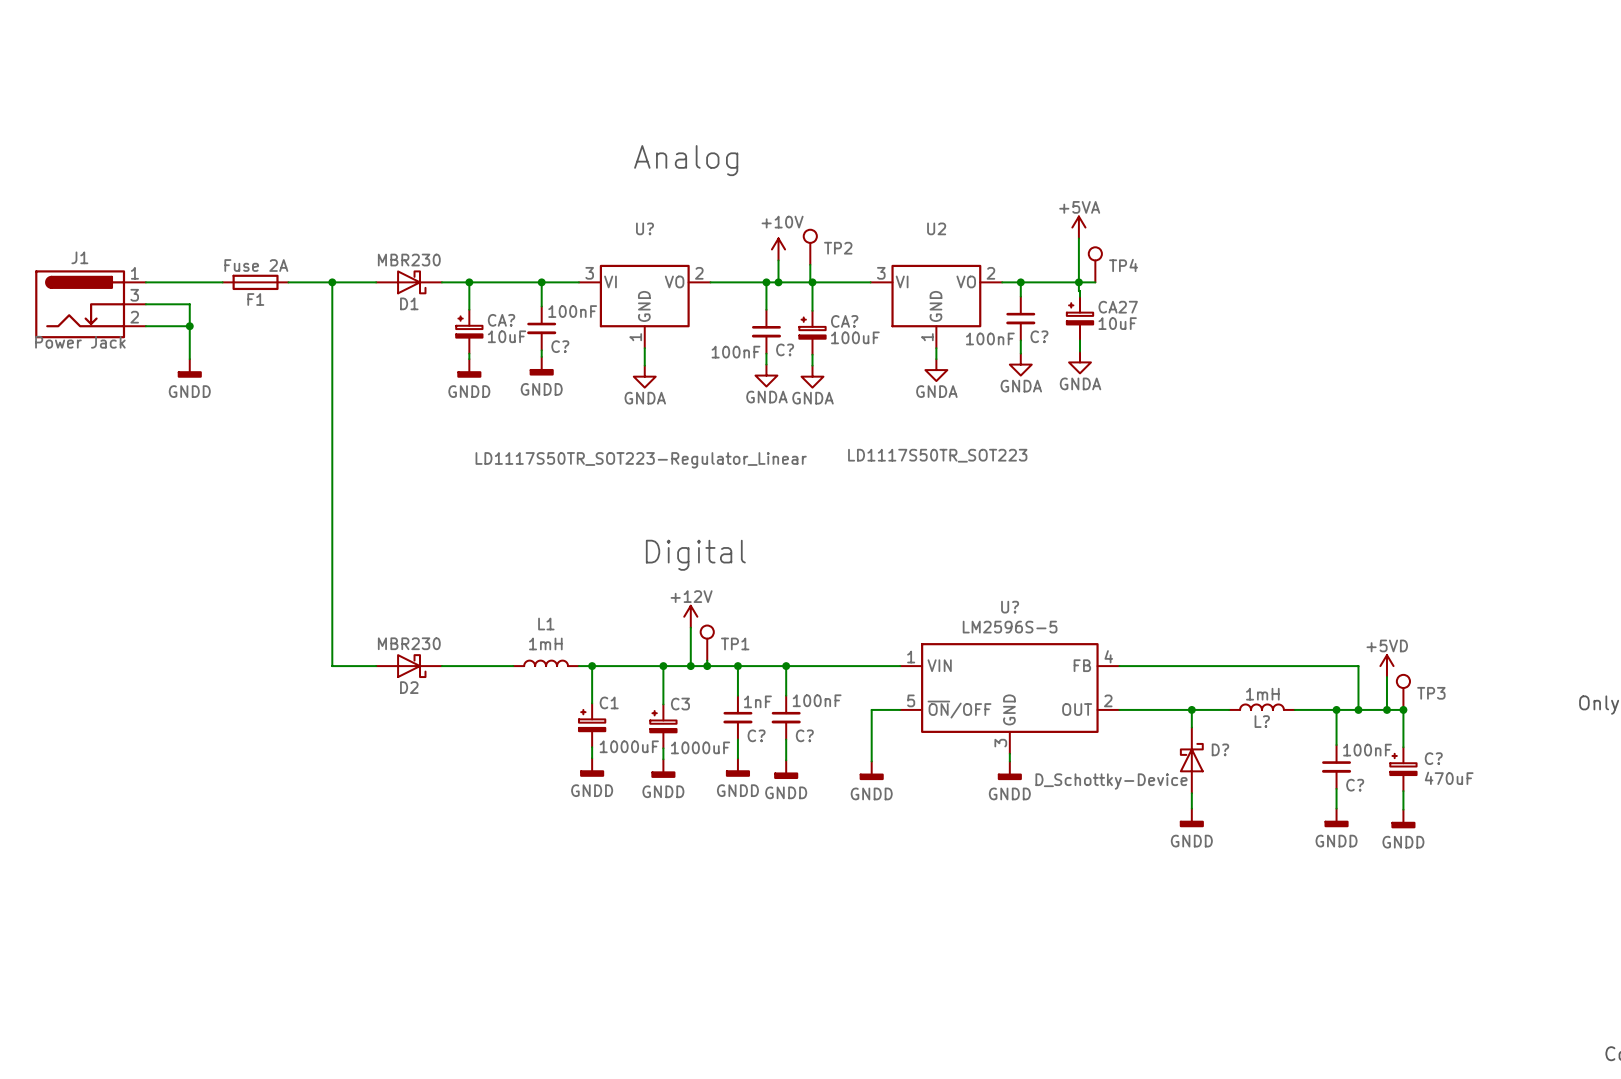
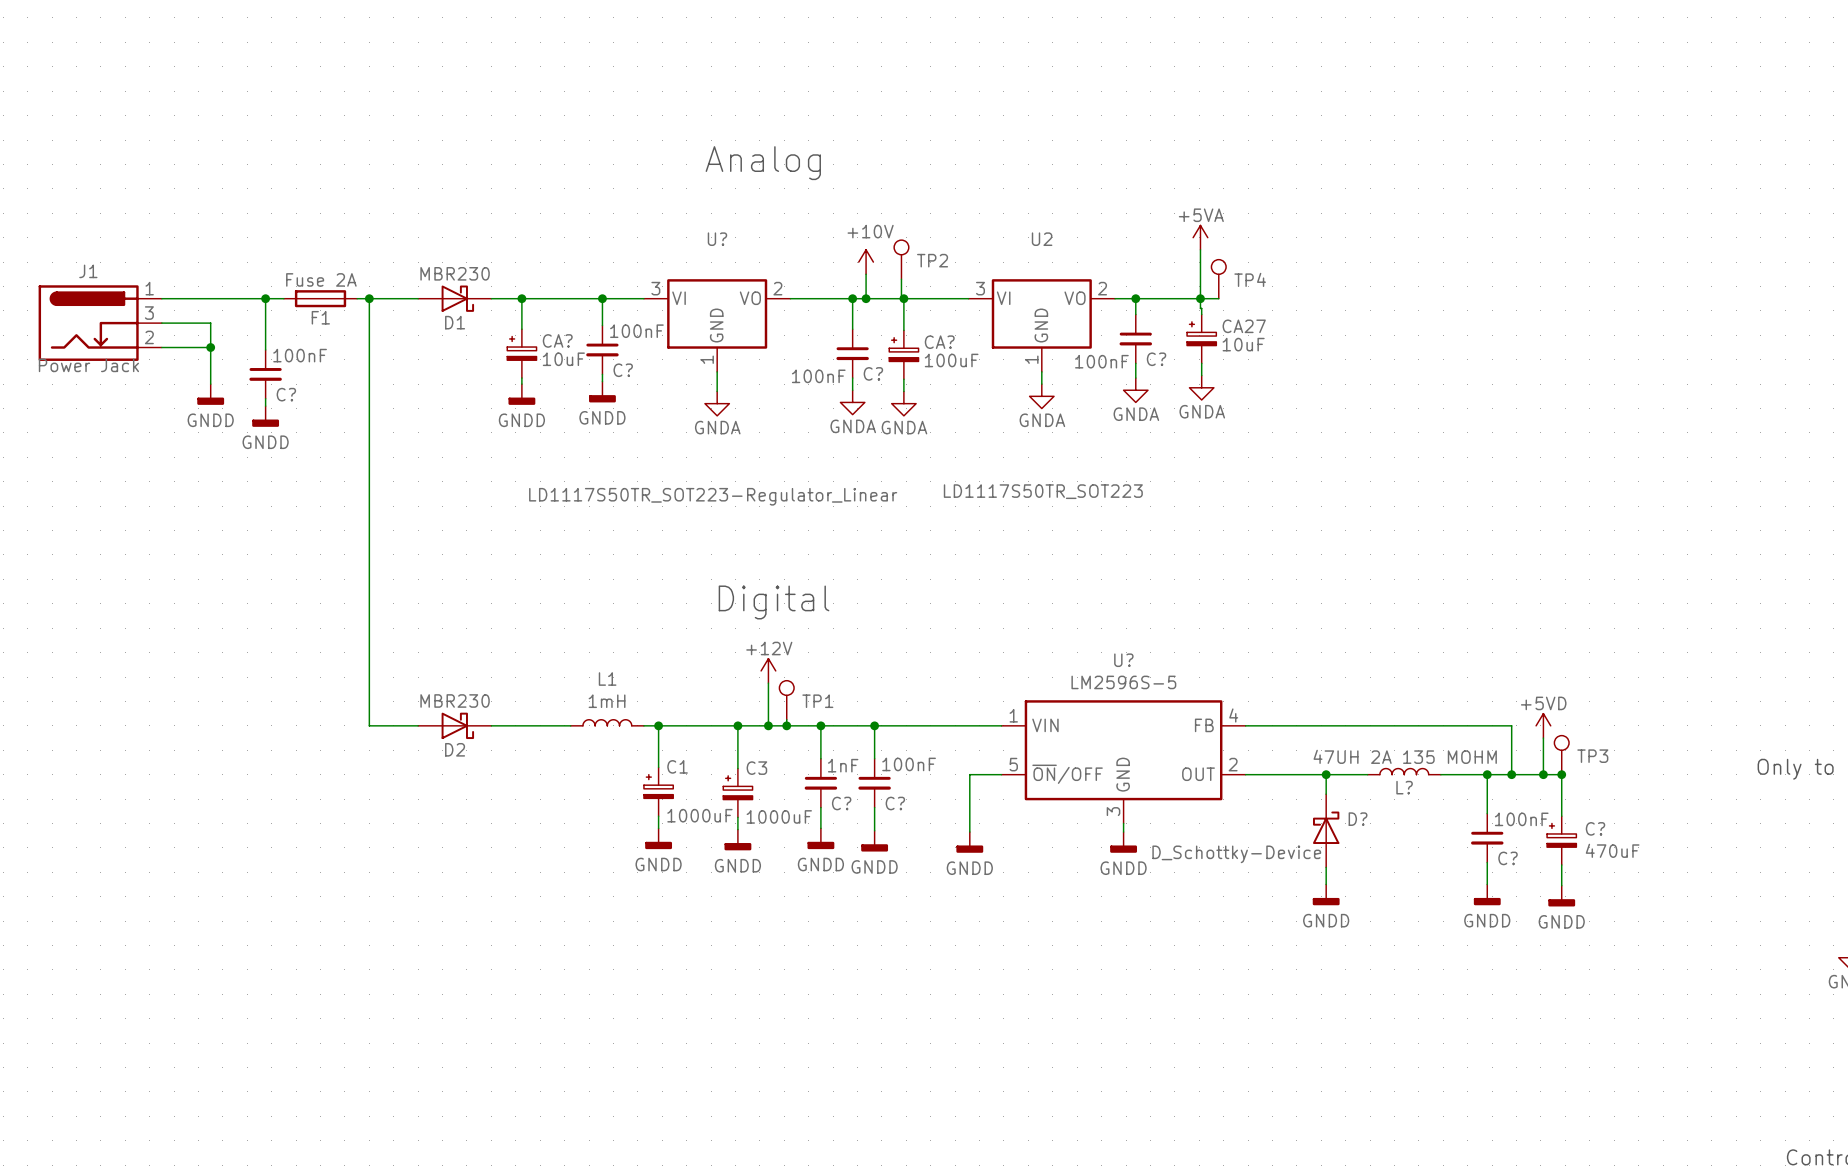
wire: none -> (265, 298) (265, 349)
junction: none -> (265, 298)
F1 position: (255, 282) -> (320, 298)
C?: none -> 100nF (265, 374)
wire: none -> (265, 398) (265, 406)
power symbol: none -> GNDD (265, 416)
L? value: 1mH (1262, 694) -> 47UH 2A 135 MOHM (1405, 756)

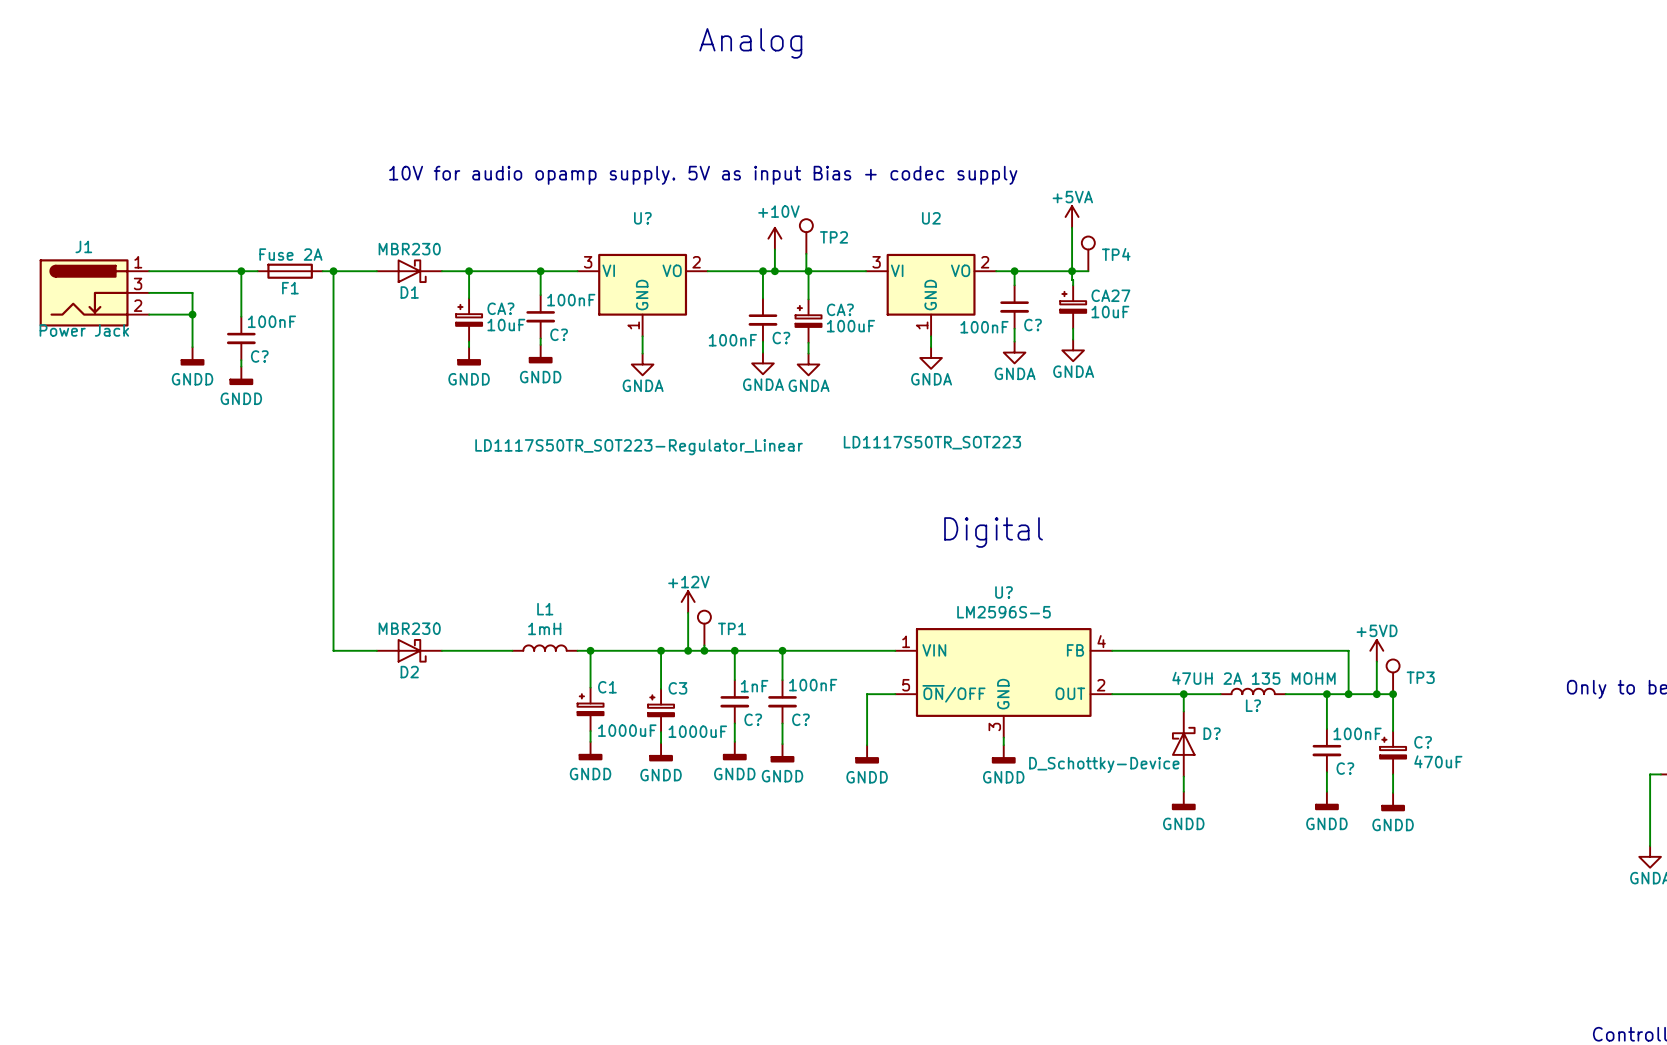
text position: Analog (763, 163) -> Analog (750, 43)
text: none -> 10V for audio opamp supply. 5V as input Bias + codec supply (703, 175)
text: none -> Digital (993, 532)
text: Digital (774, 602) -> none

